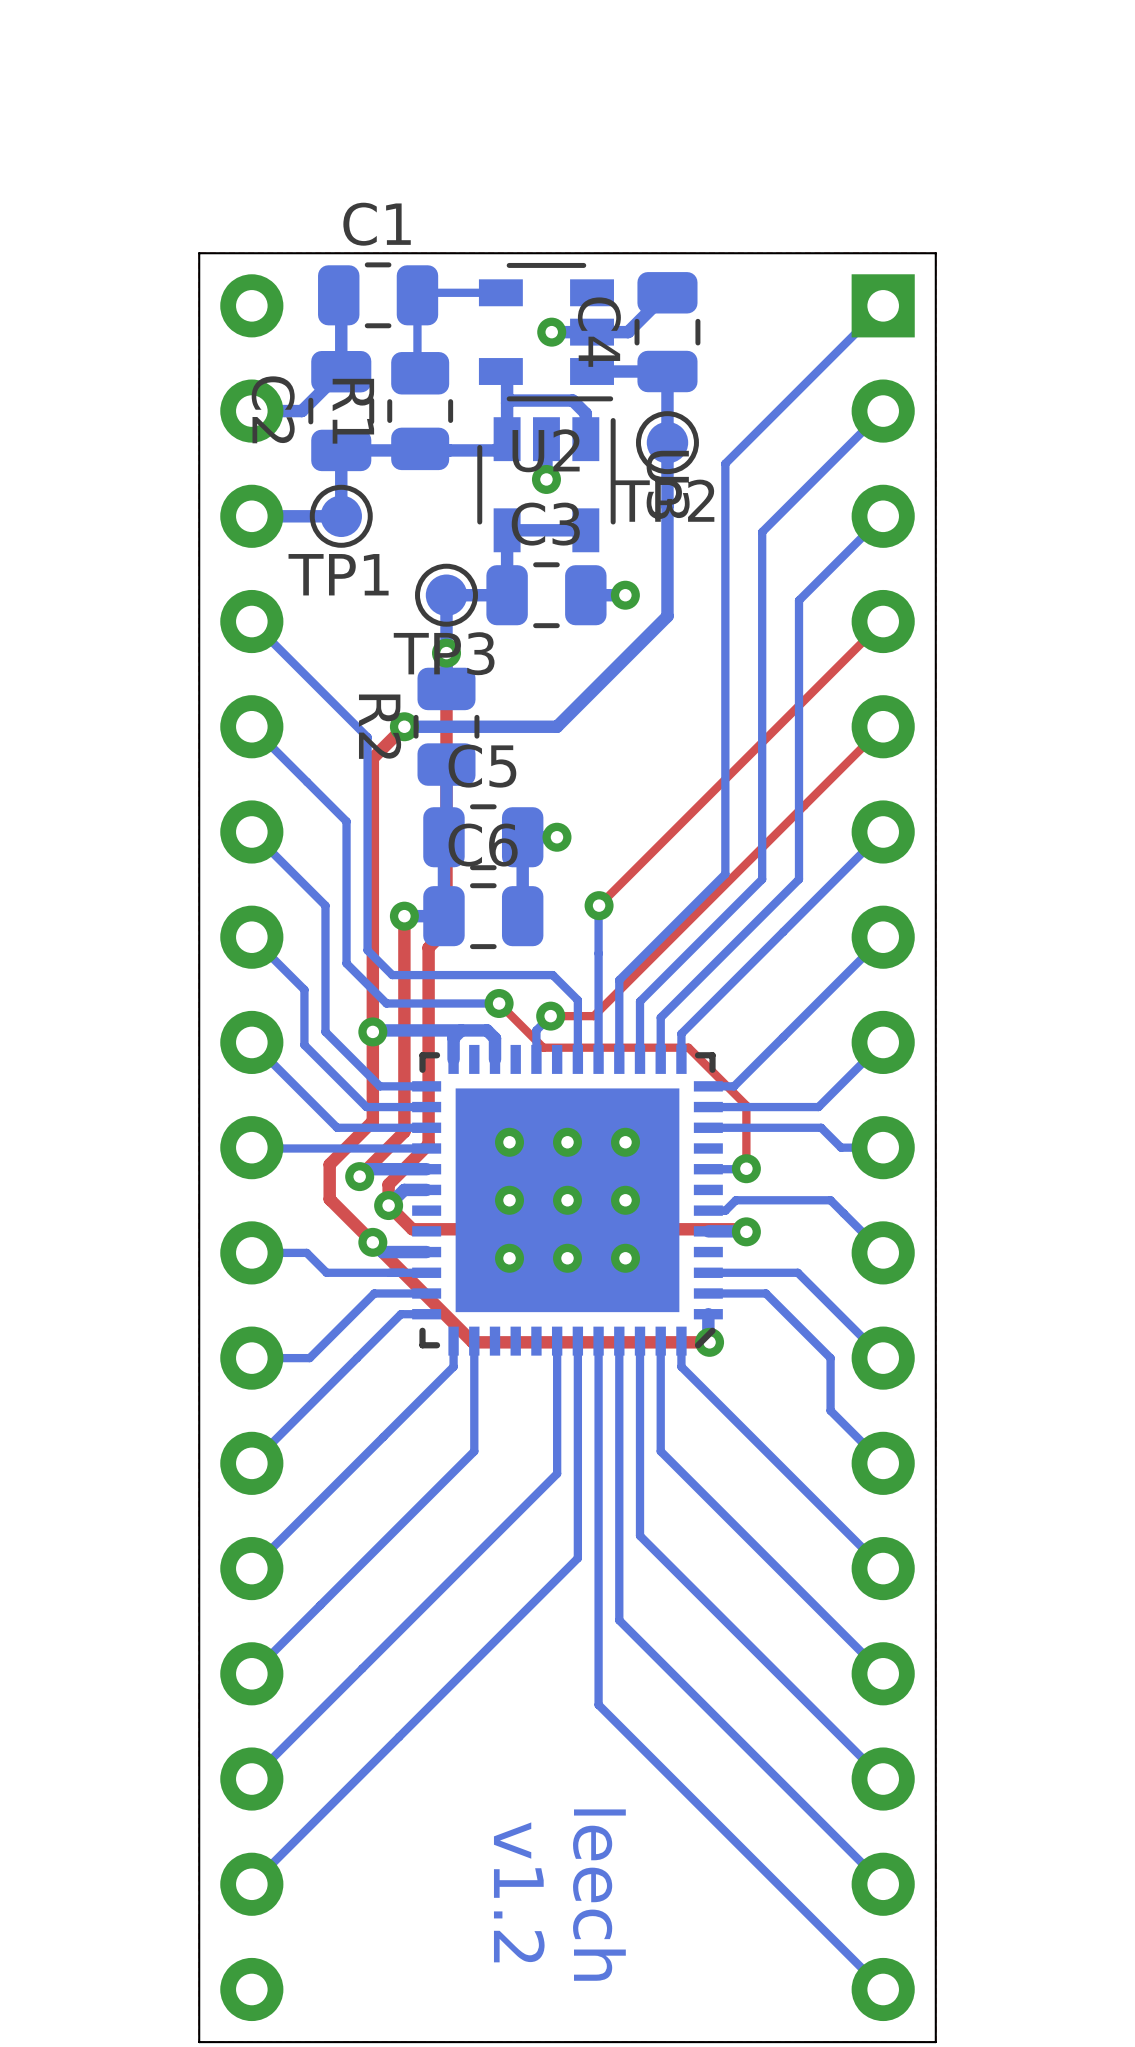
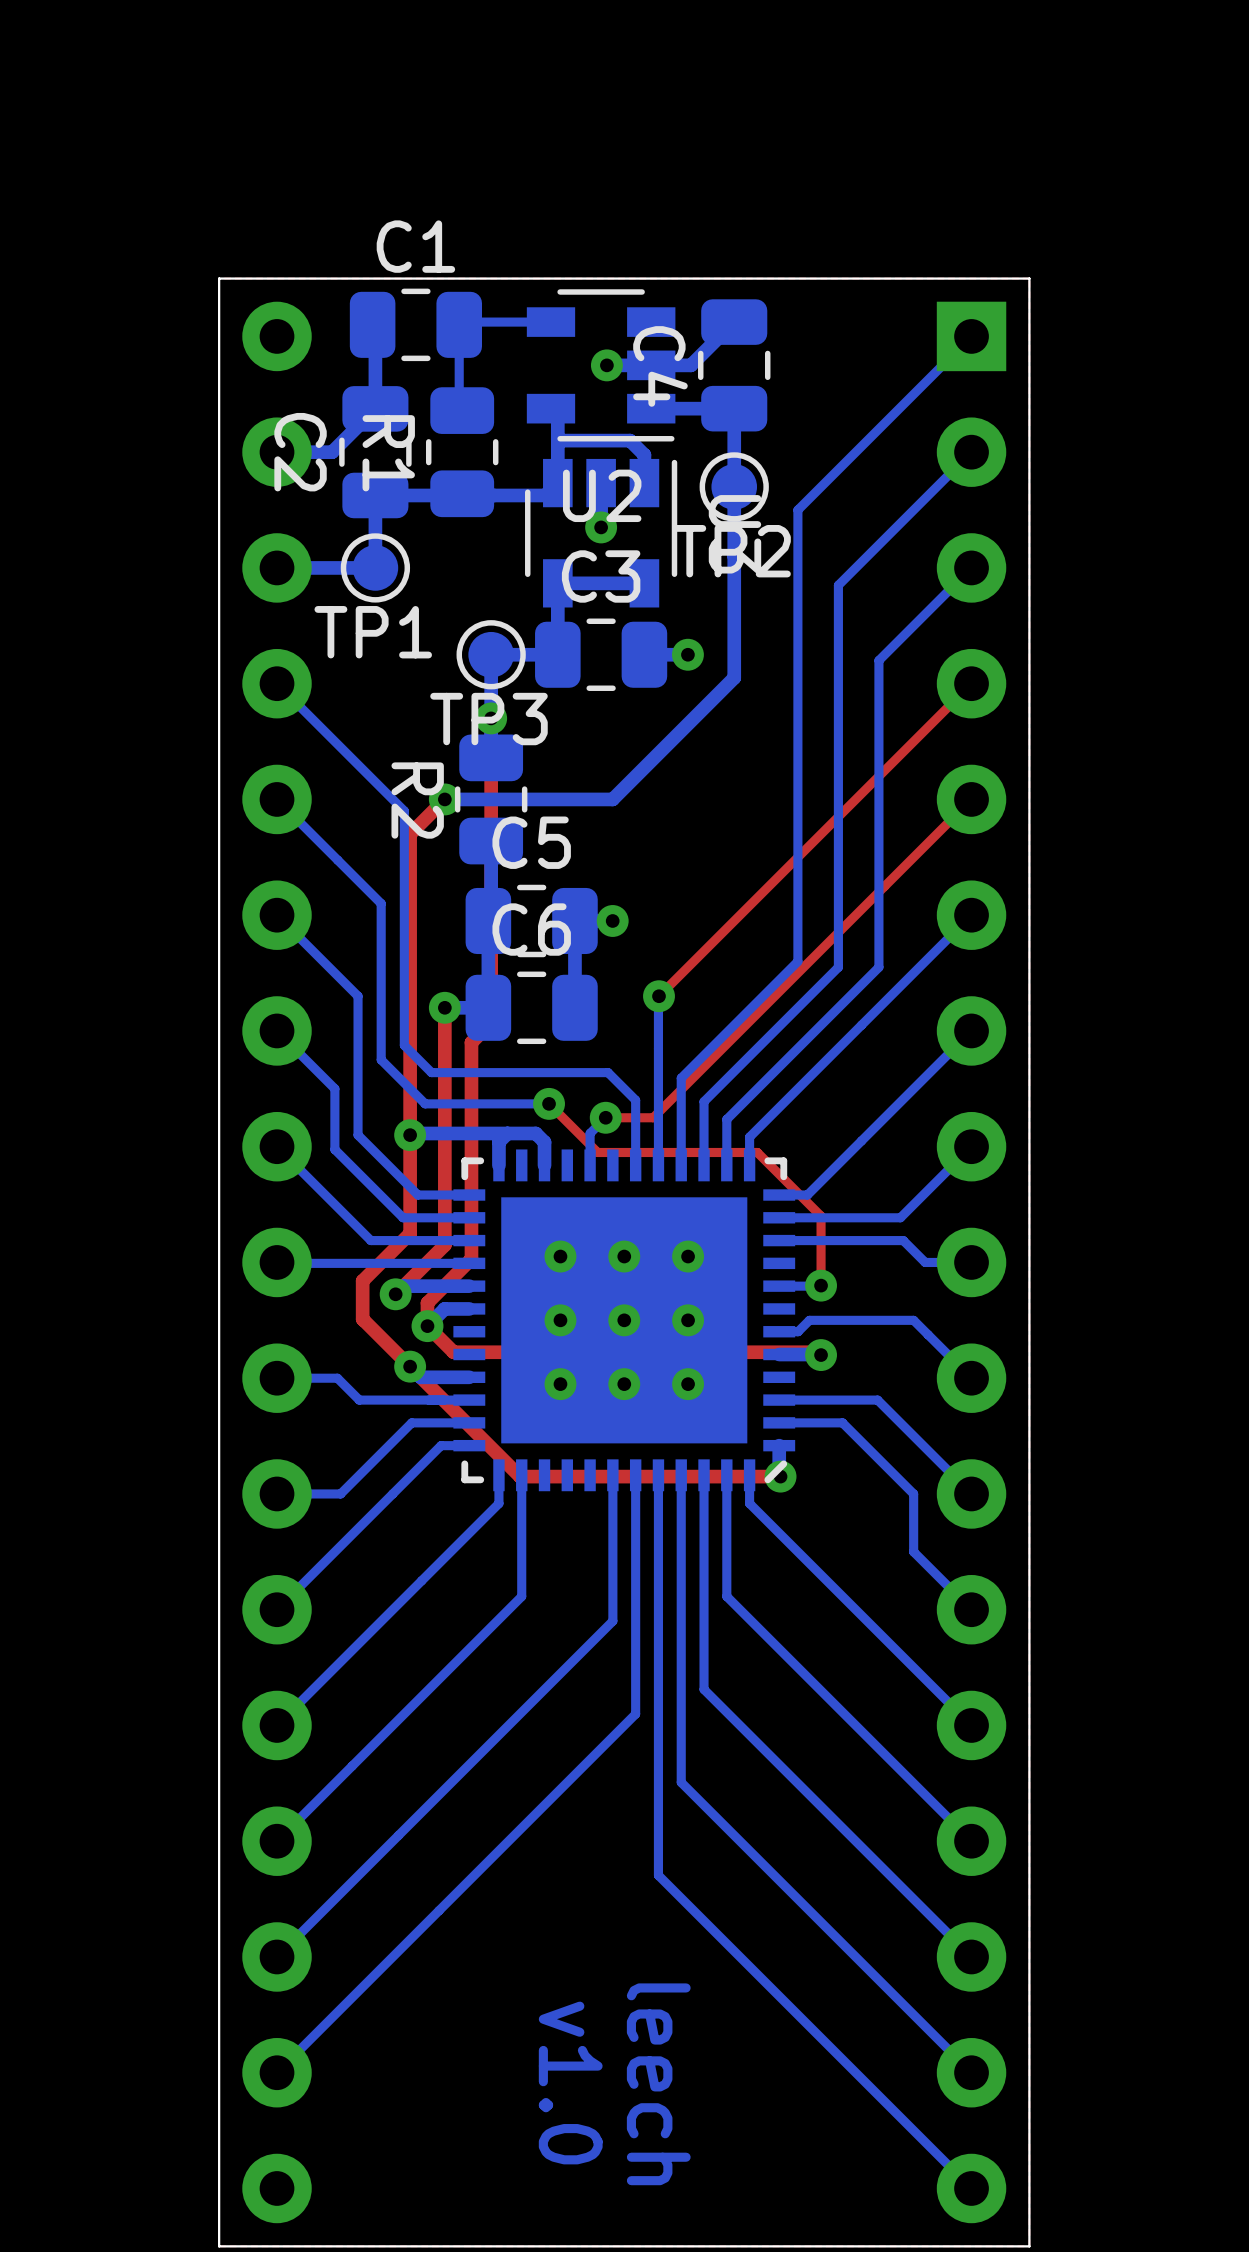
text: v1.2 (519, 1892) -> v1.0 (570, 2083)

